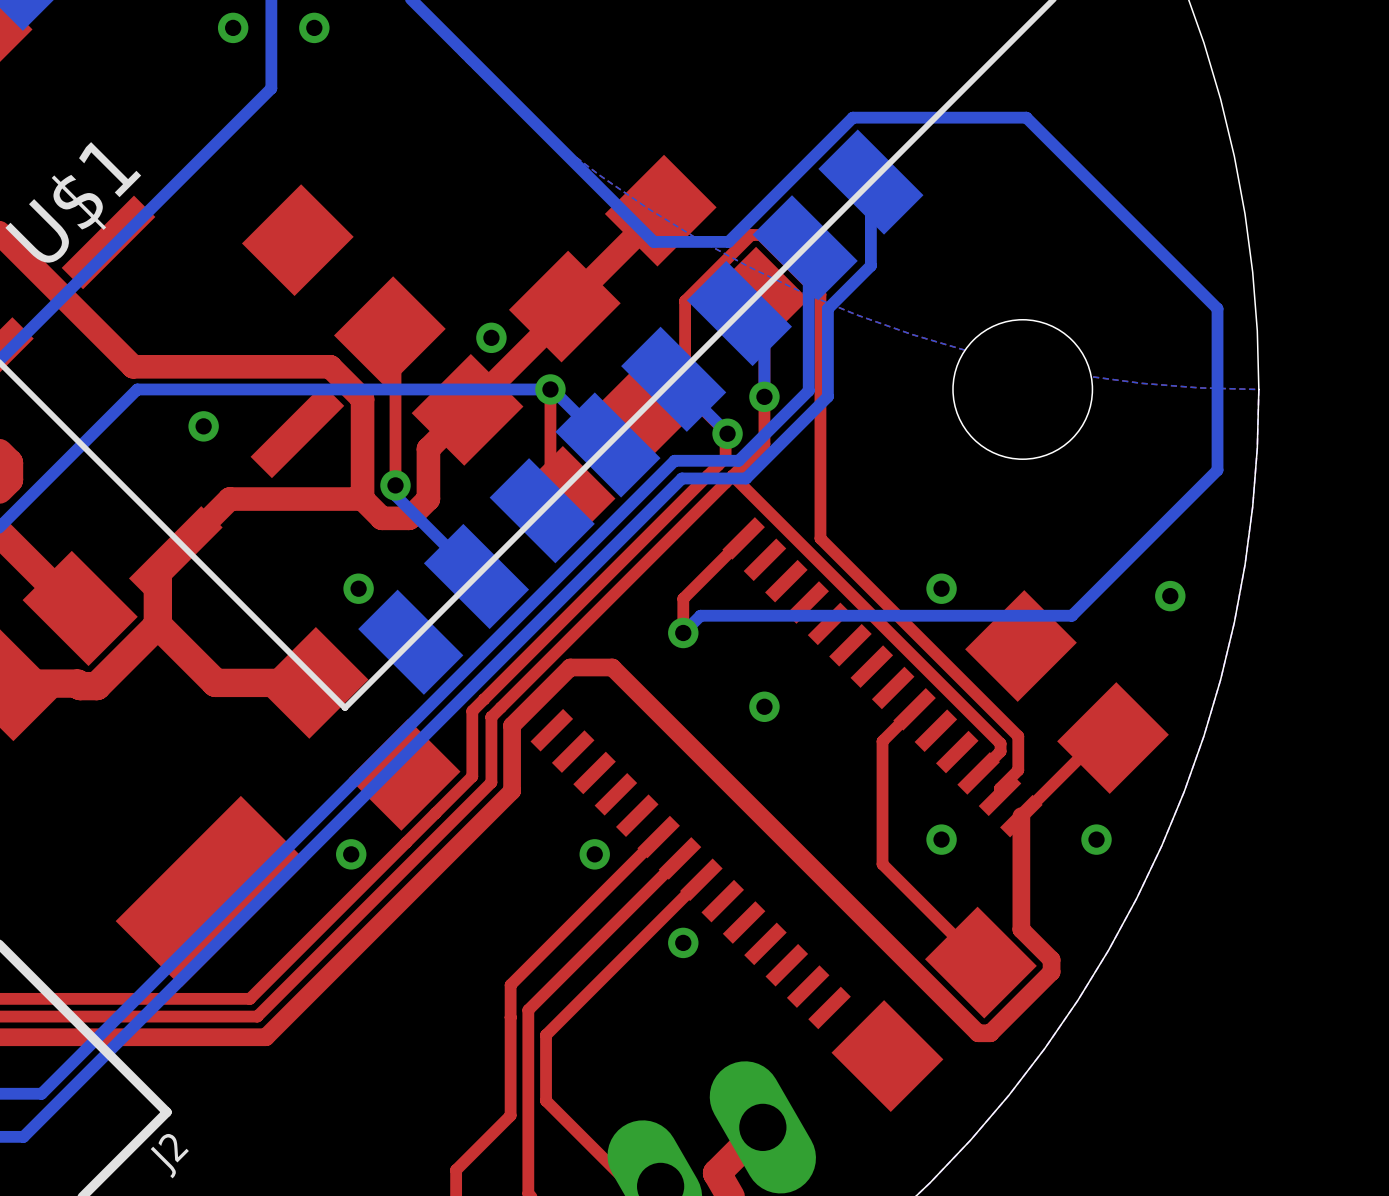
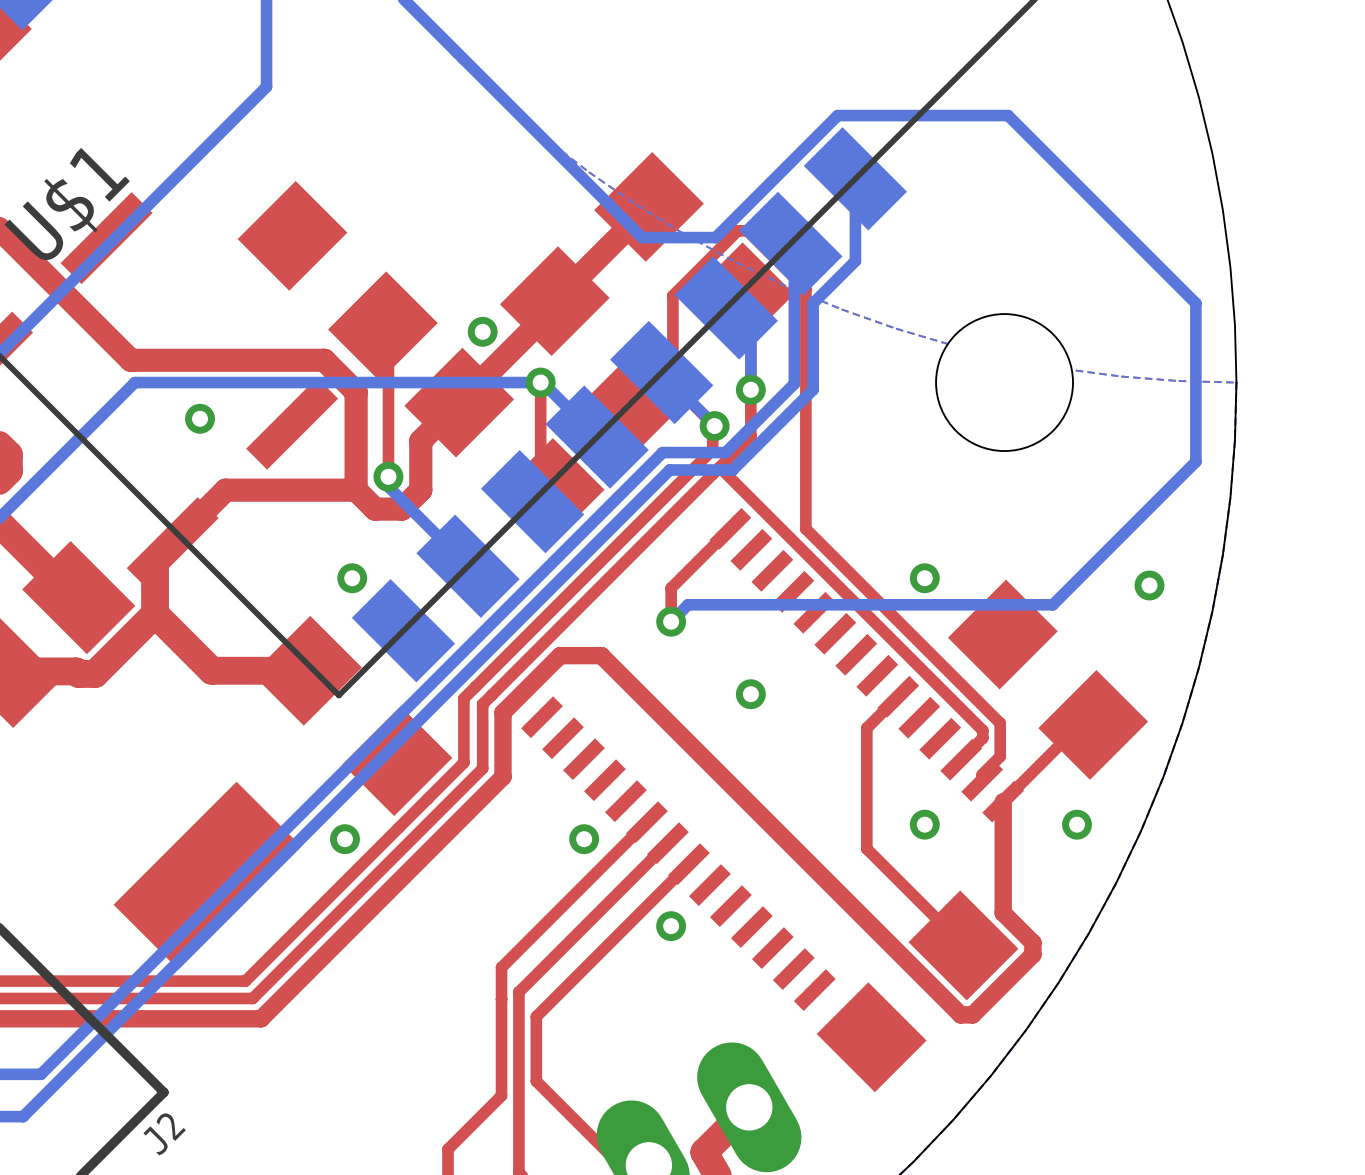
via: (233, 27) -> none
via: (314, 27) -> none

